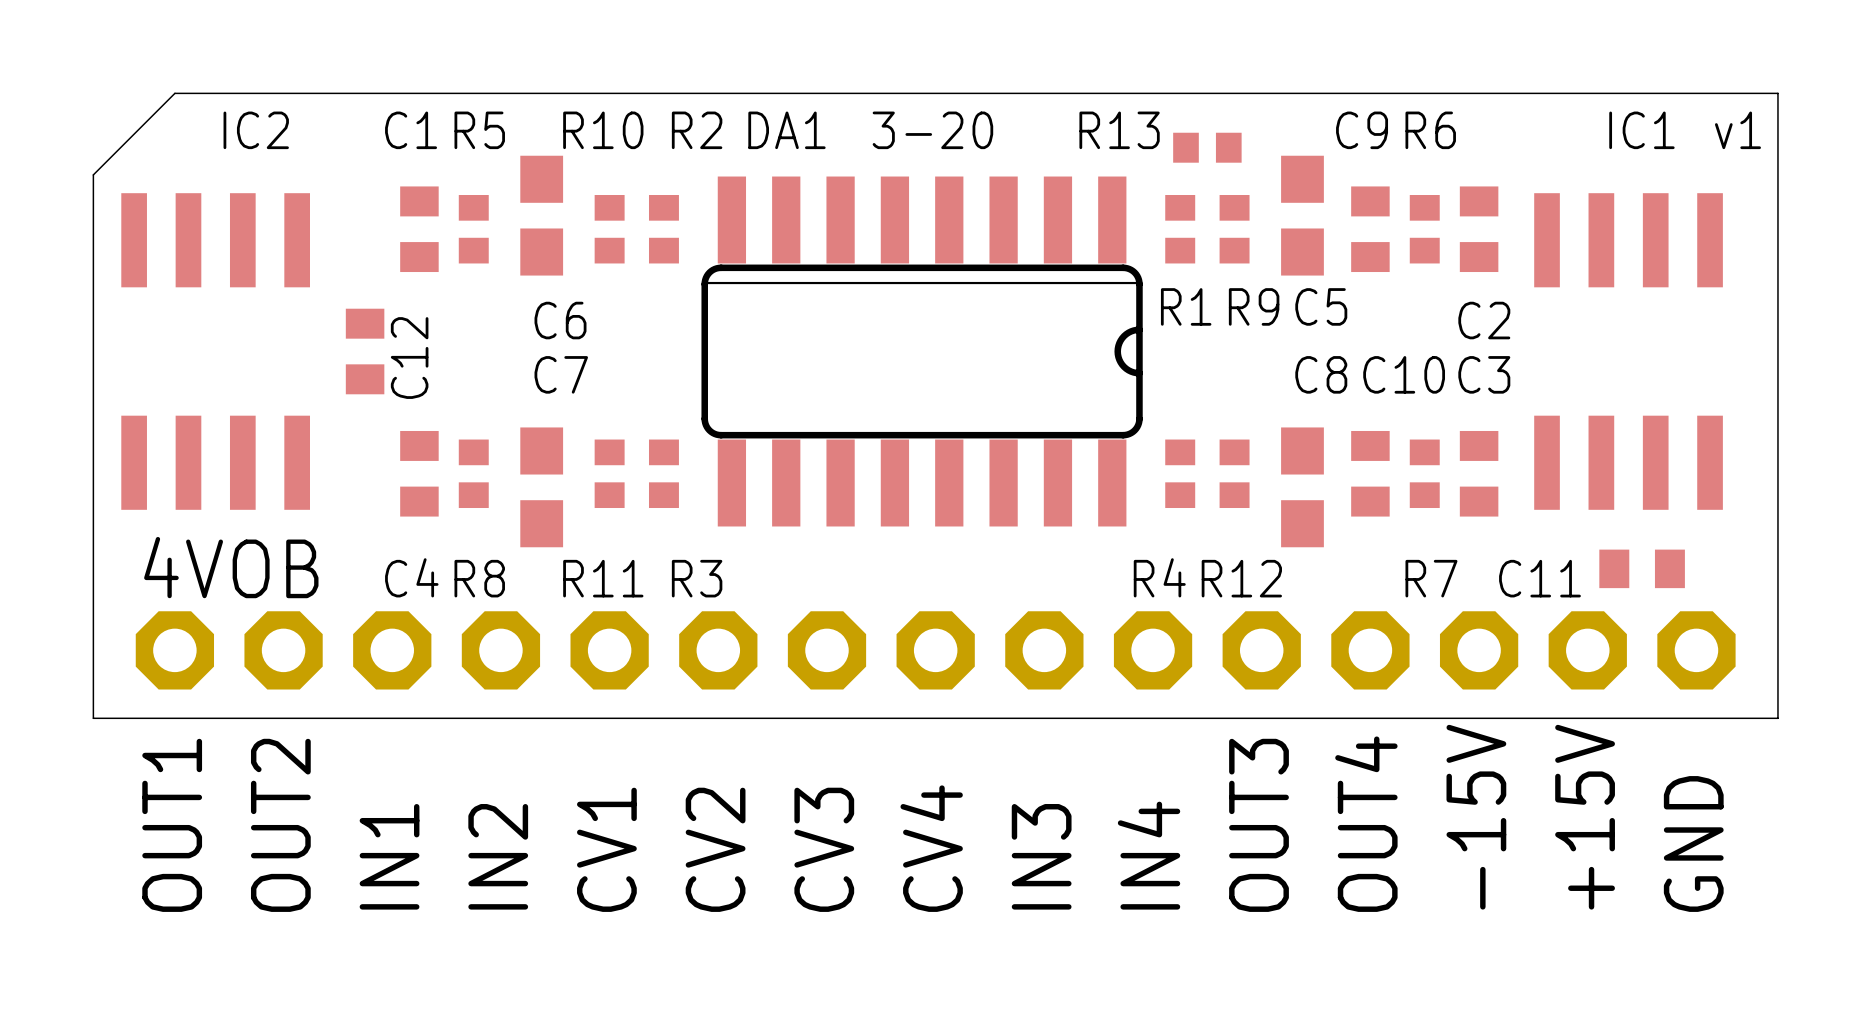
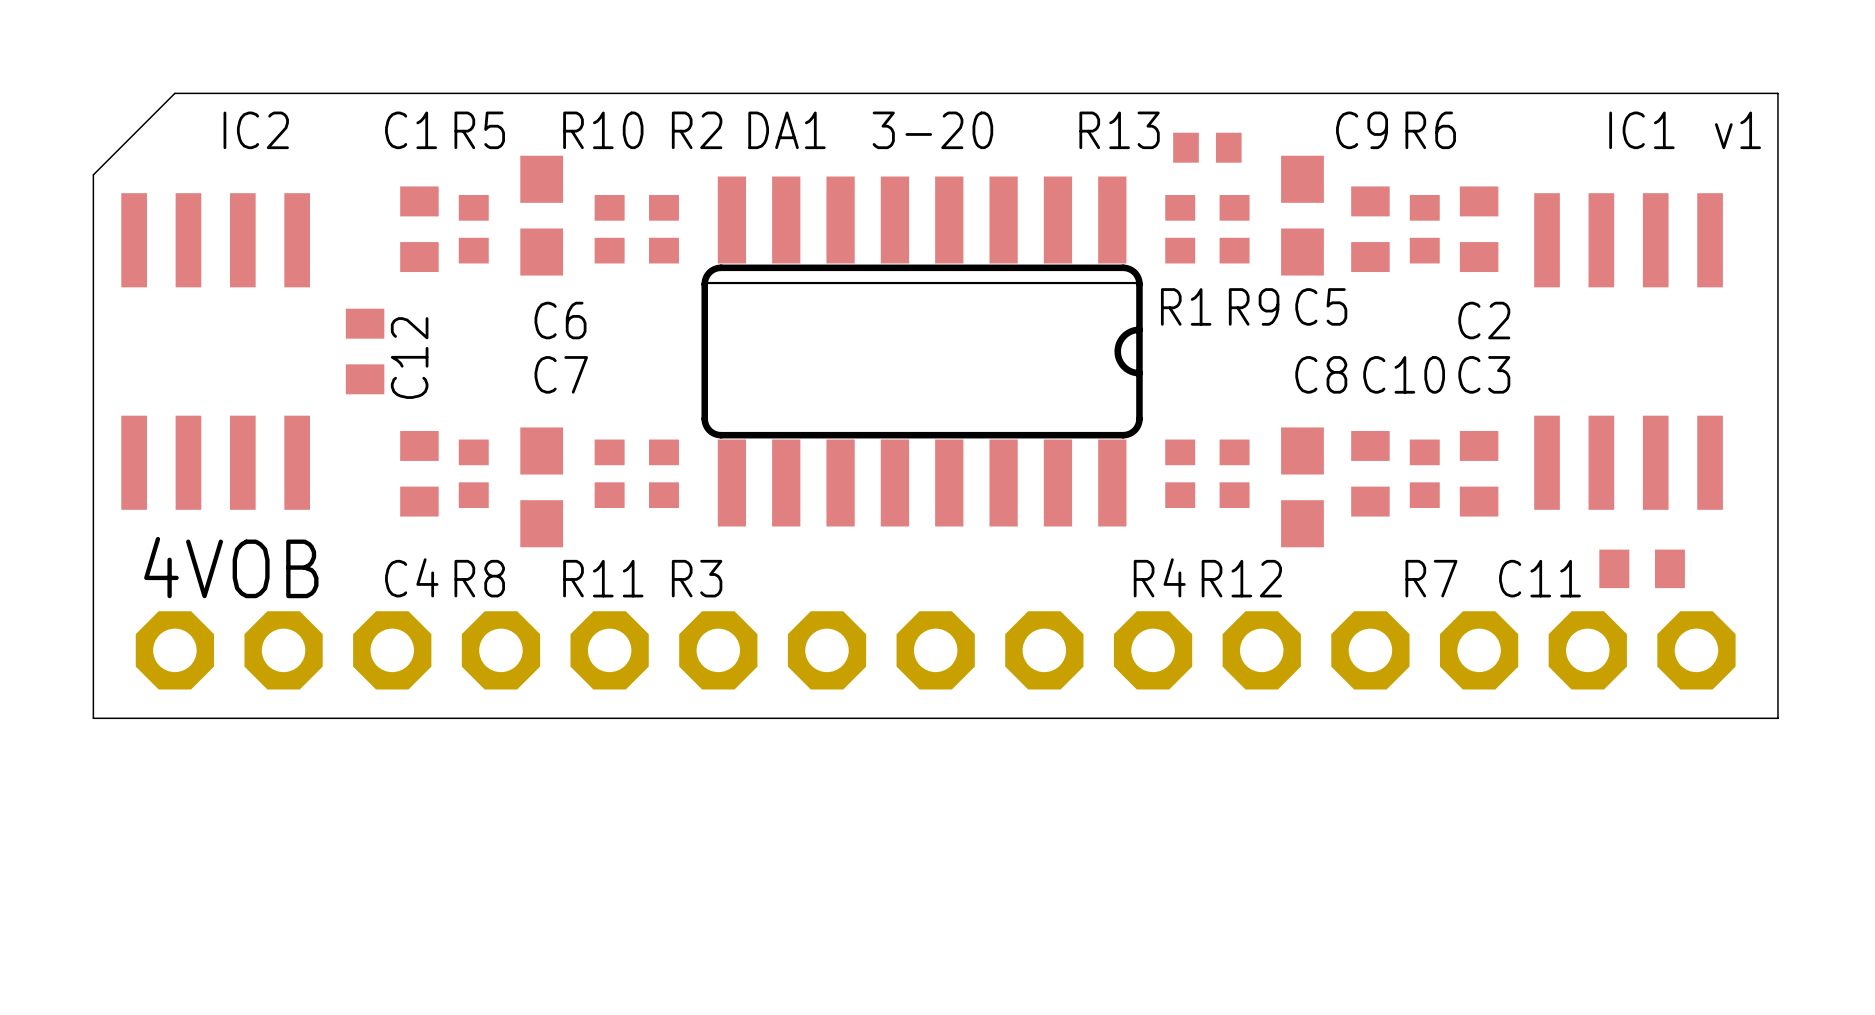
-15V name: -15V (1476, 817) -> none
+15V name: +15V (1585, 817) -> none
OUT4 name: OUT4 (1366, 824) -> none
OUT1 name: OUT1 (172, 825) -> none
OUT2 name: OUT2 (280, 825) -> none
OUT3 name: OUT3 (1259, 825) -> none
GND name: GND (1693, 843) -> none
CV4 name: CV4 (931, 848) -> none
CV1 name: CV1 (606, 849) -> none
CV2 name: CV2 (715, 849) -> none
CV3 name: CV3 (824, 849) -> none
IN4 name: IN4 (1149, 855) -> none
IN1 name: IN1 (389, 856) -> none
IN2 name: IN2 (498, 856) -> none
IN3 name: IN3 (1041, 856) -> none

